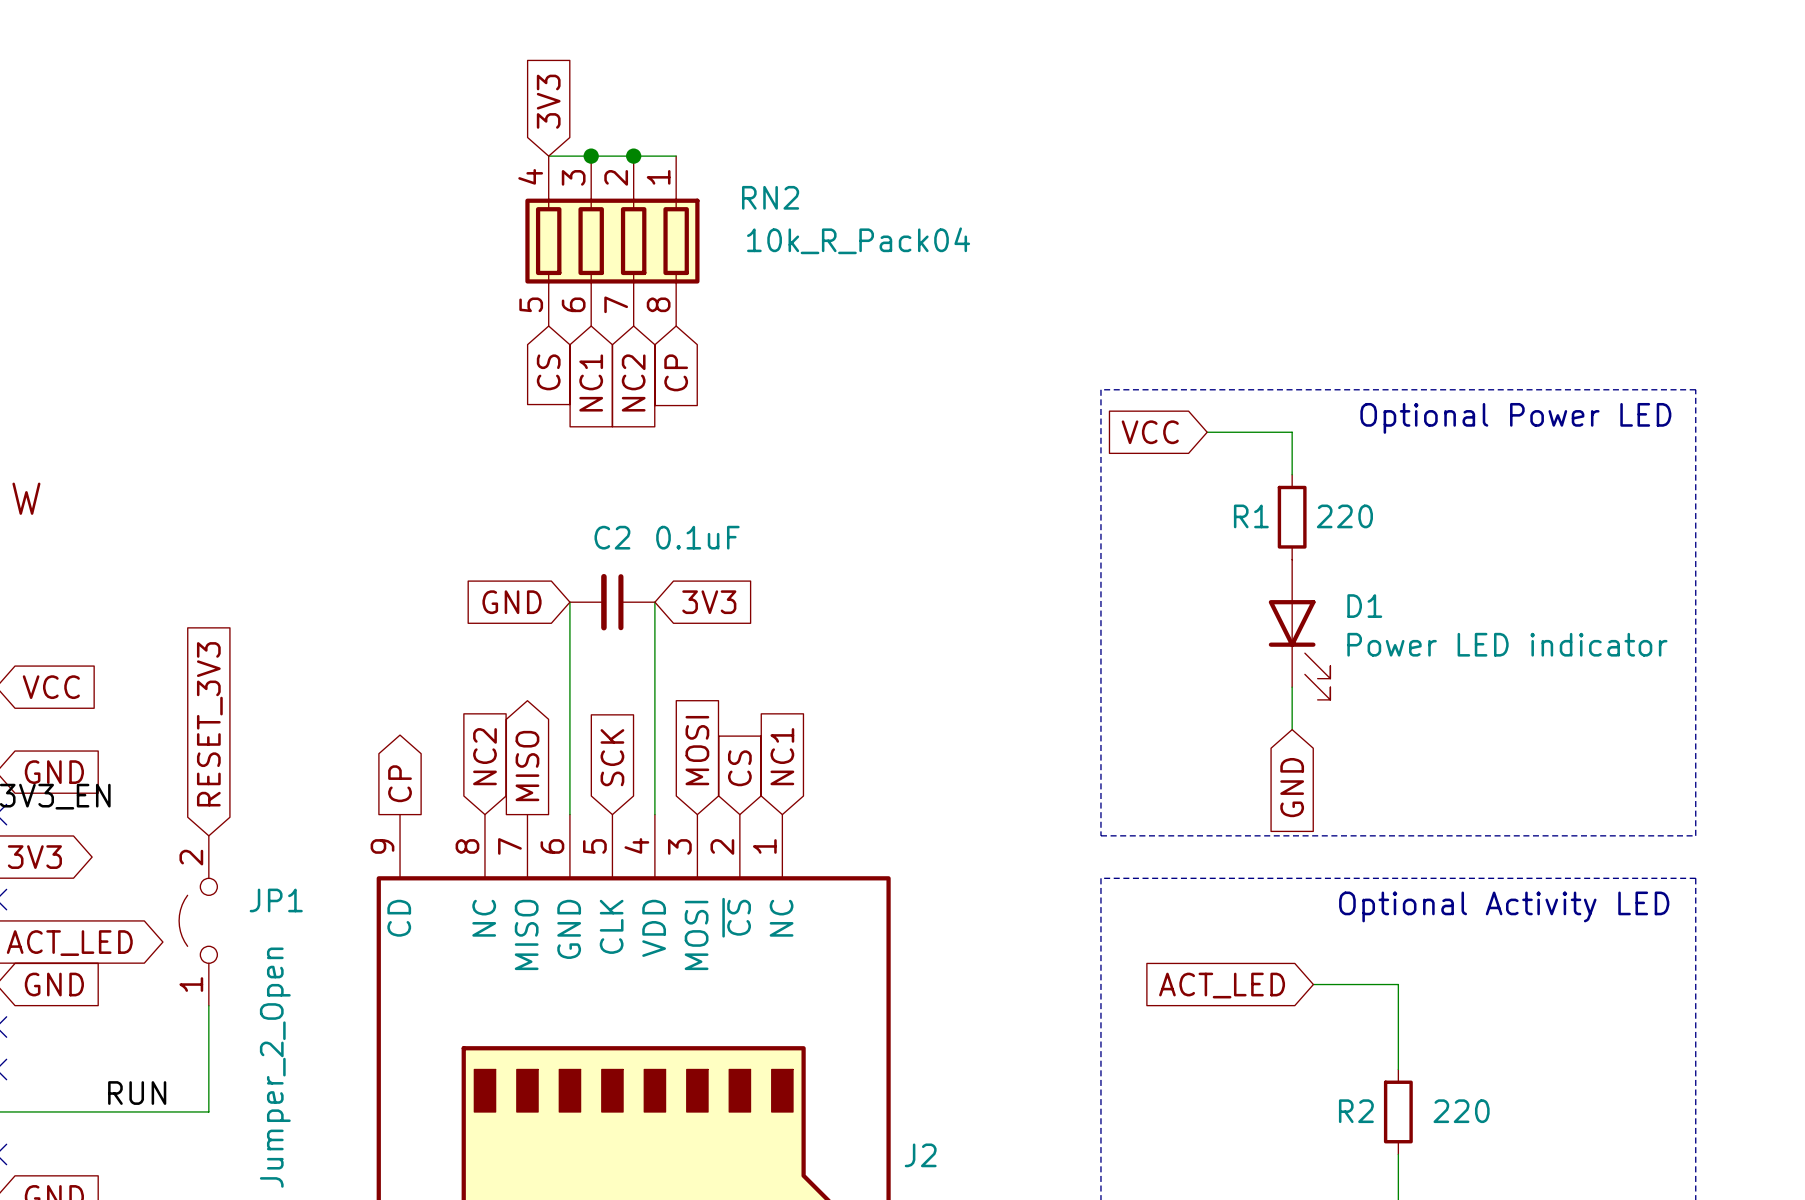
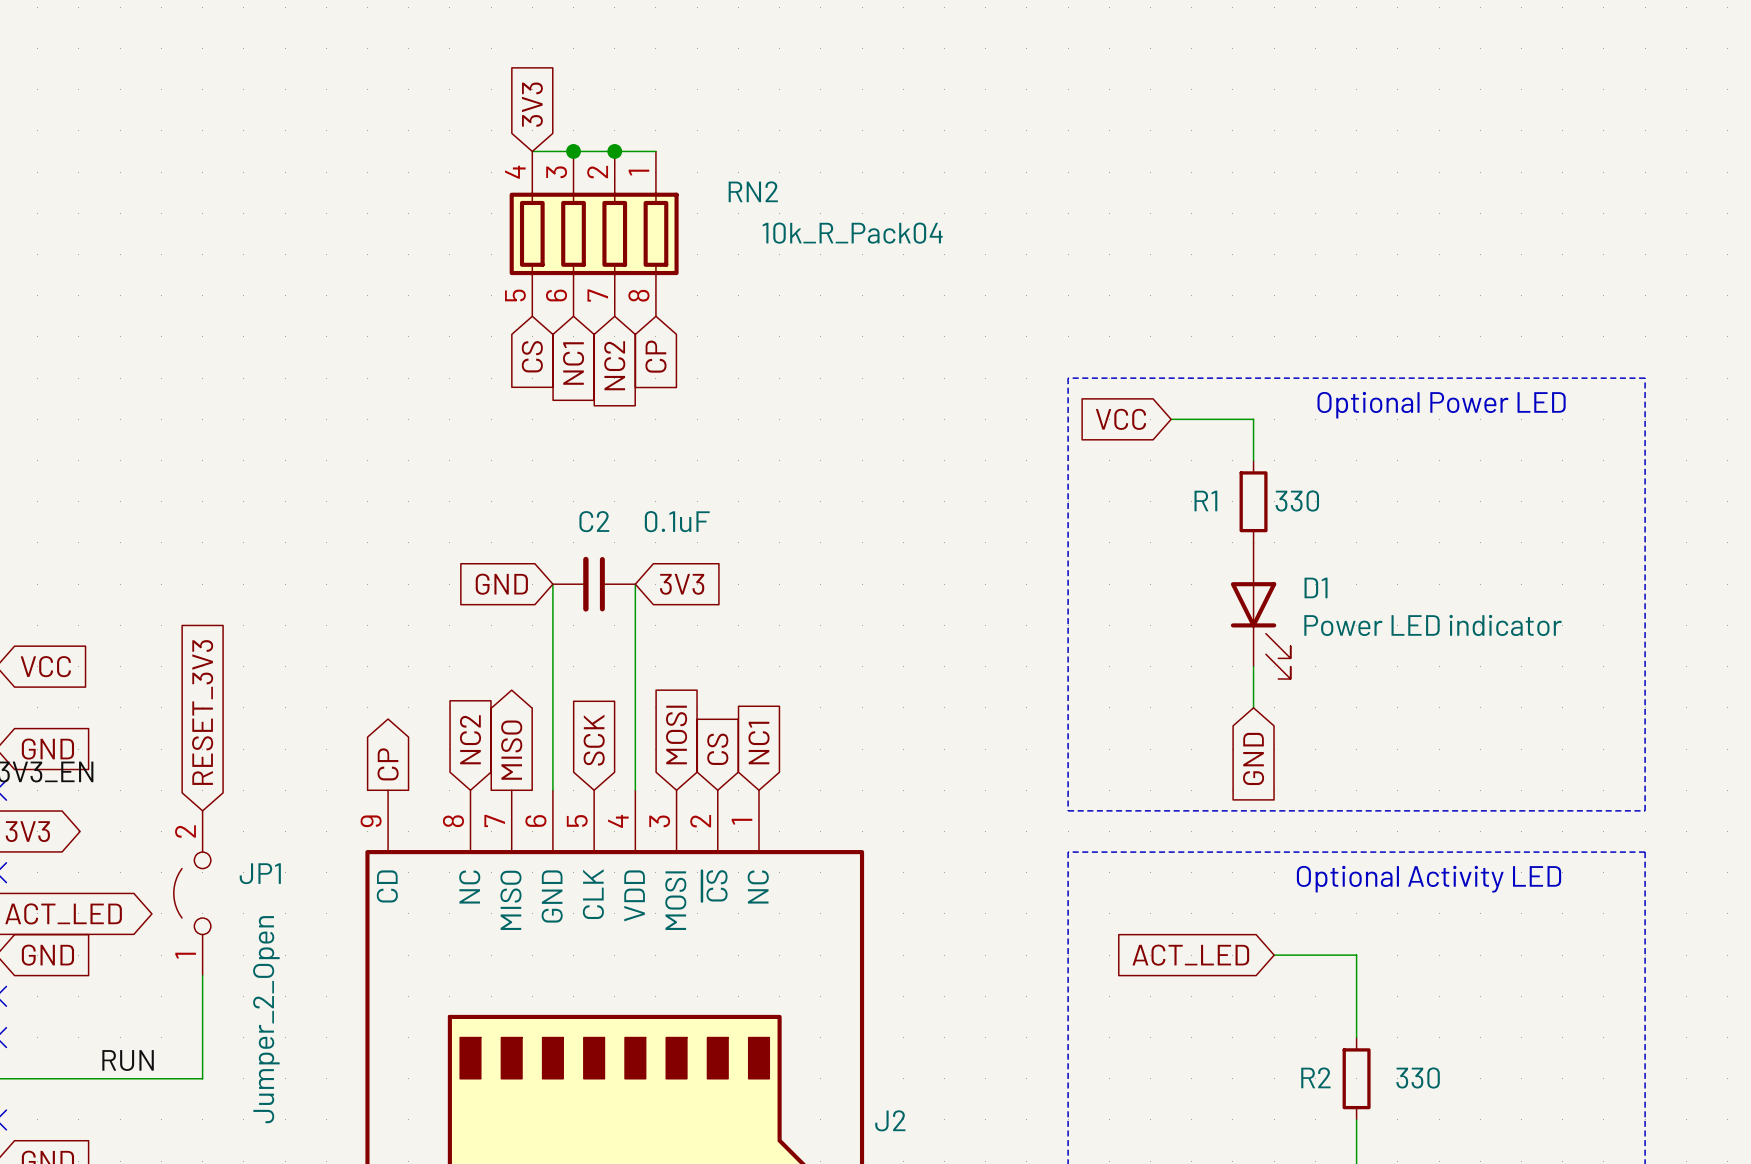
R1 value: 220 (1344, 516) -> 330 (1297, 501)
R2 value: 220 (1461, 1111) -> 330 (1418, 1078)

